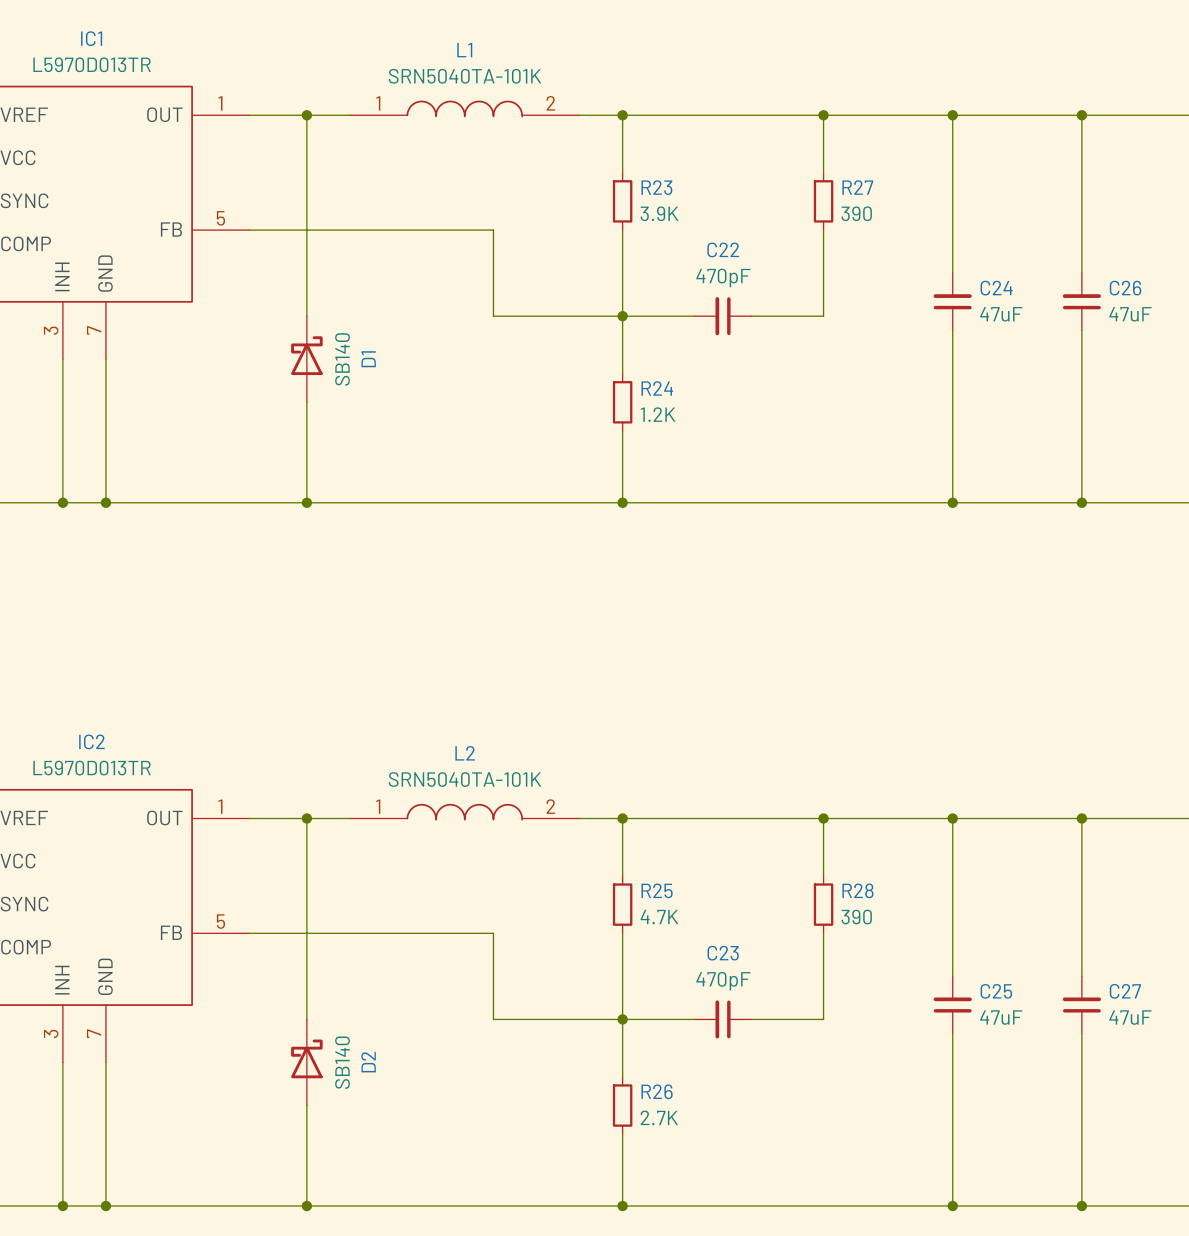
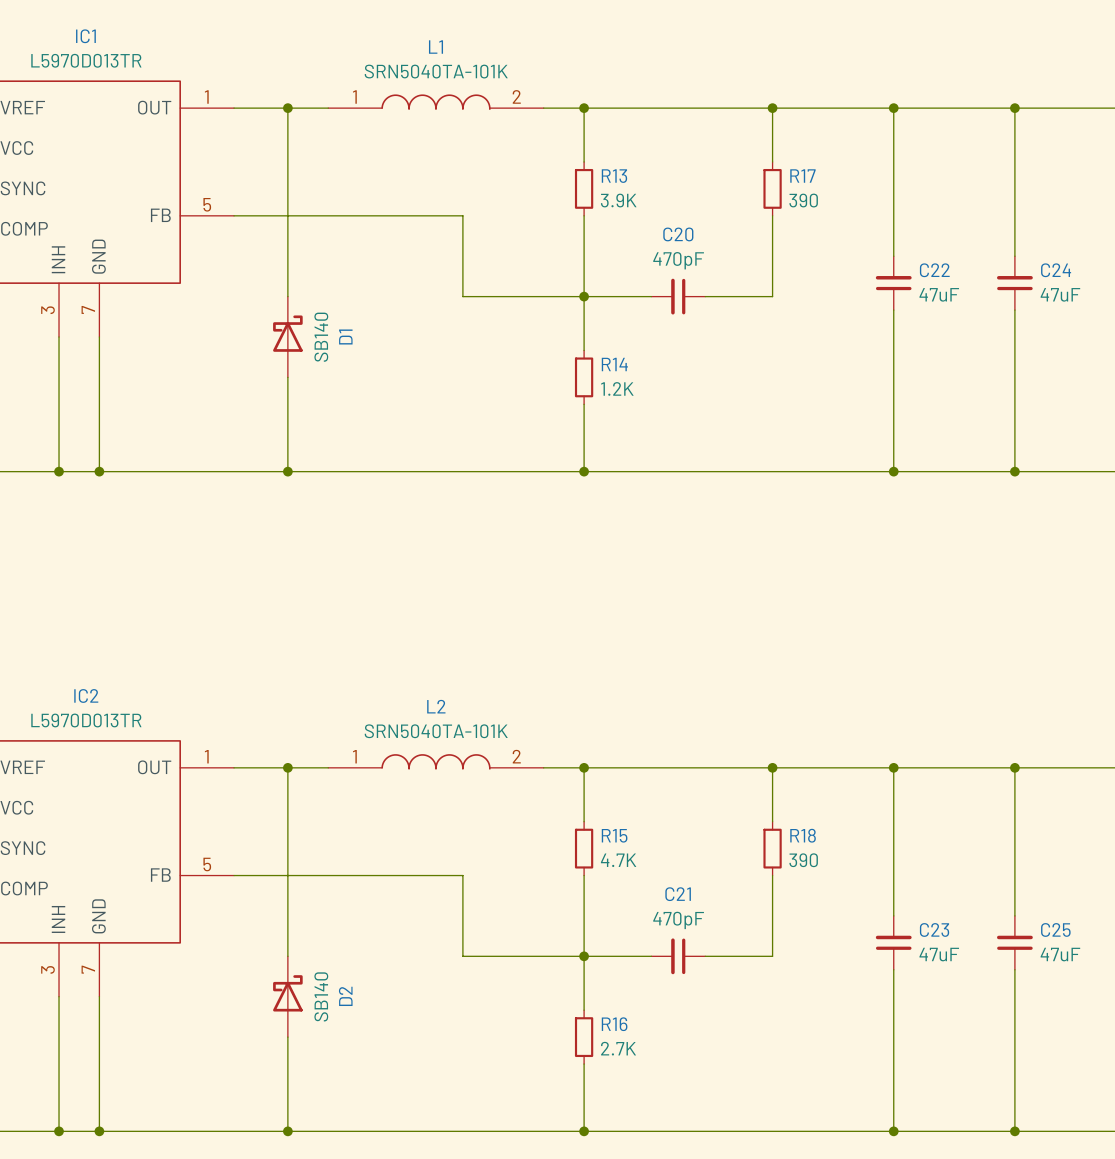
R23 name: R23 (656, 187) -> R13 (614, 176)
R27 name: R27 (857, 187) -> R17 (802, 176)
C22 name: C22 (723, 249) -> C20 (678, 234)
C24 name: C24 (996, 288) -> C22 (934, 270)
C26 name: C26 (1125, 288) -> C24 (1056, 270)
R24 name: R24 (657, 388) -> R14 (614, 364)
R25 name: R25 (657, 890) -> R15 (614, 835)
R28 name: R28 (857, 890) -> R18 (803, 835)
C23 name: C23 (723, 953) -> C21 (678, 894)
C25 name: C25 (996, 991) -> C23 (934, 929)
C27 name: C27 (1125, 991) -> C25 (1055, 929)
R26 name: R26 (657, 1091) -> R16 (614, 1024)

